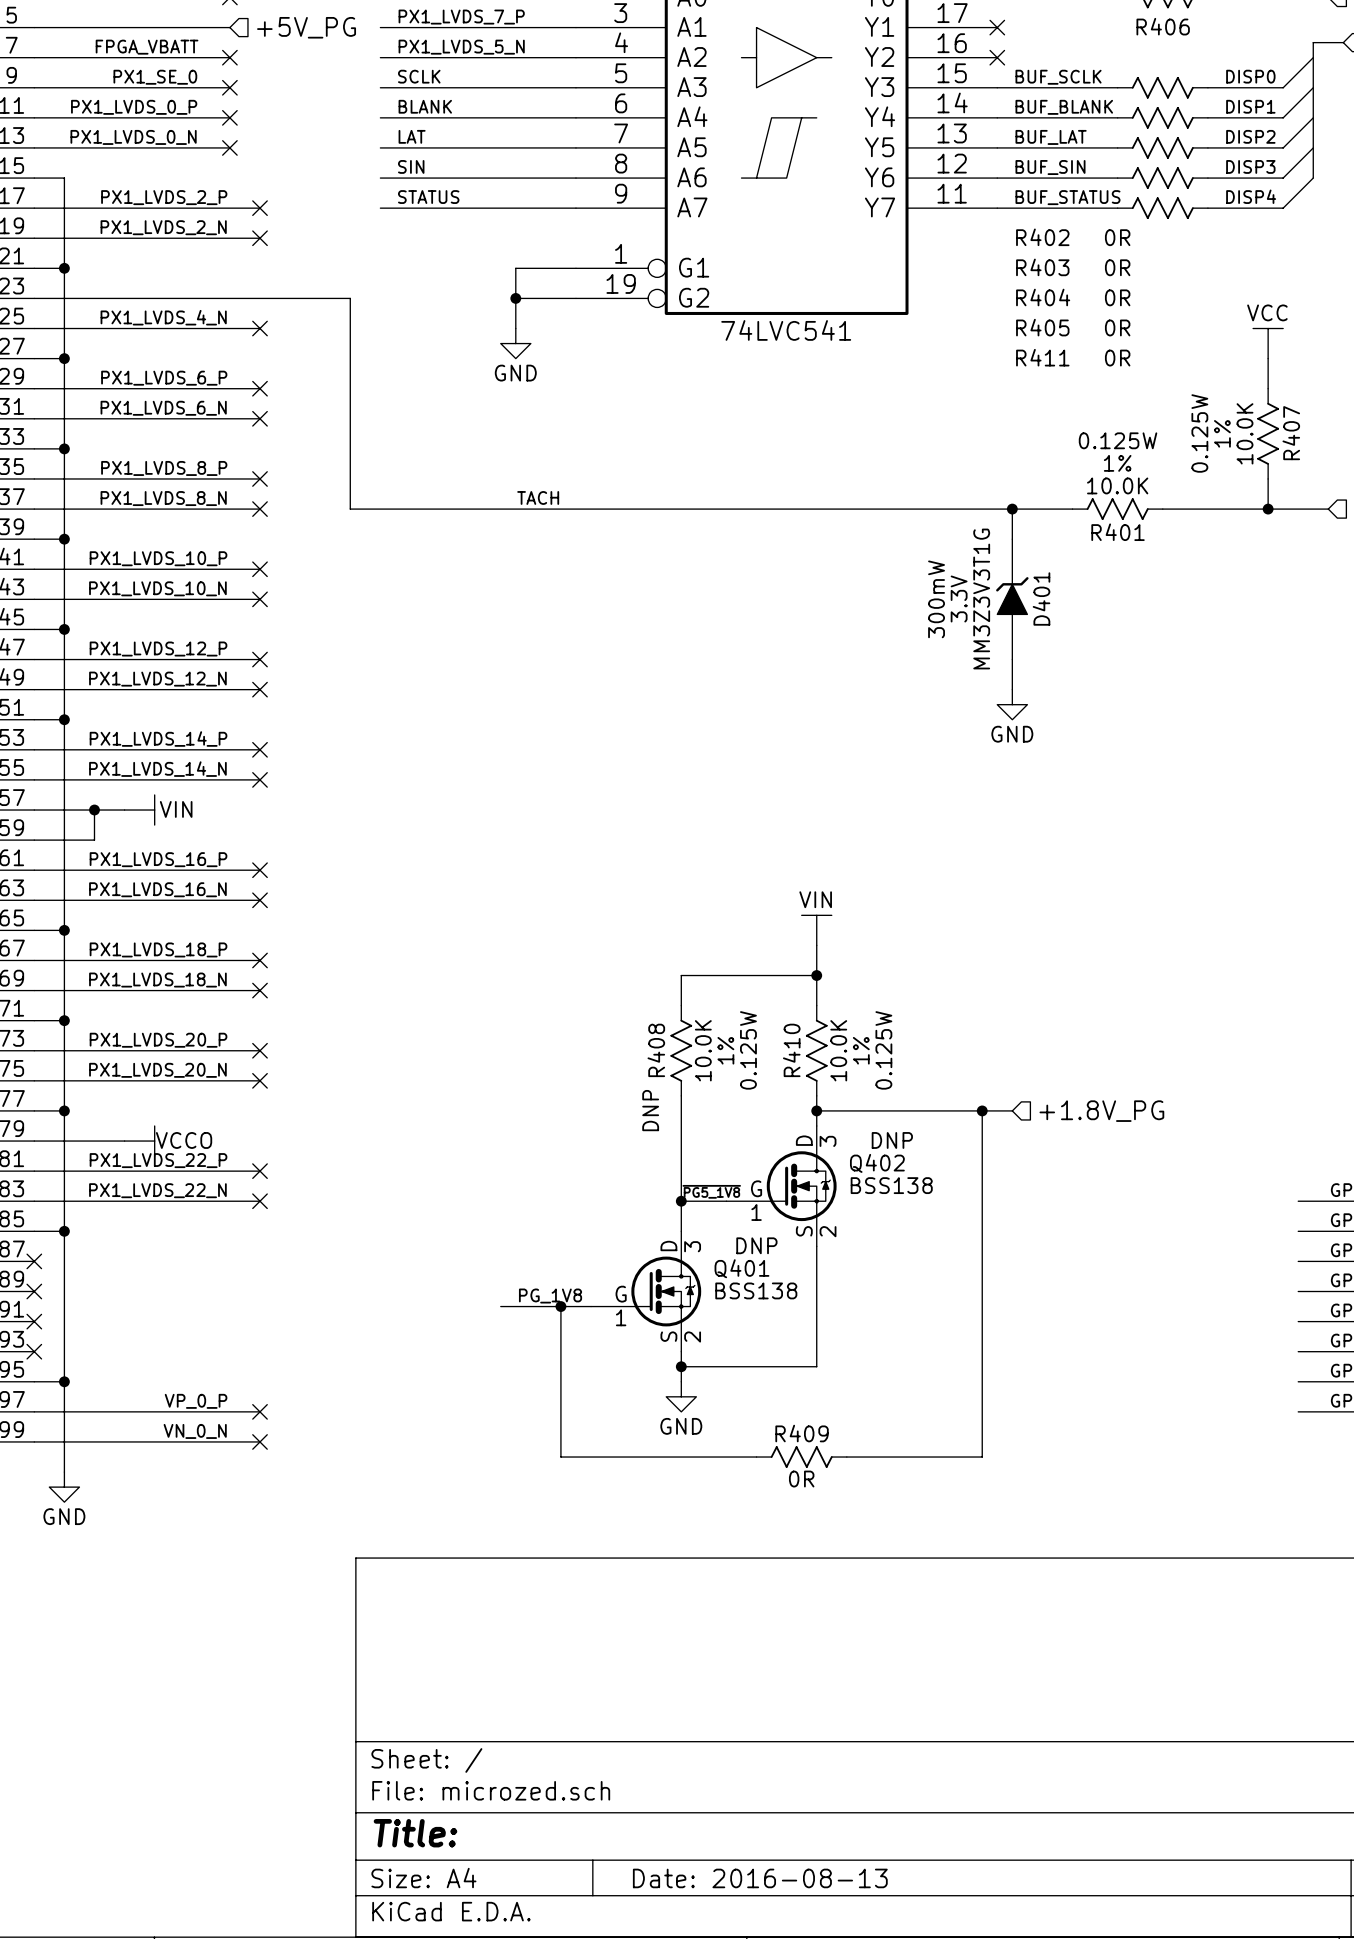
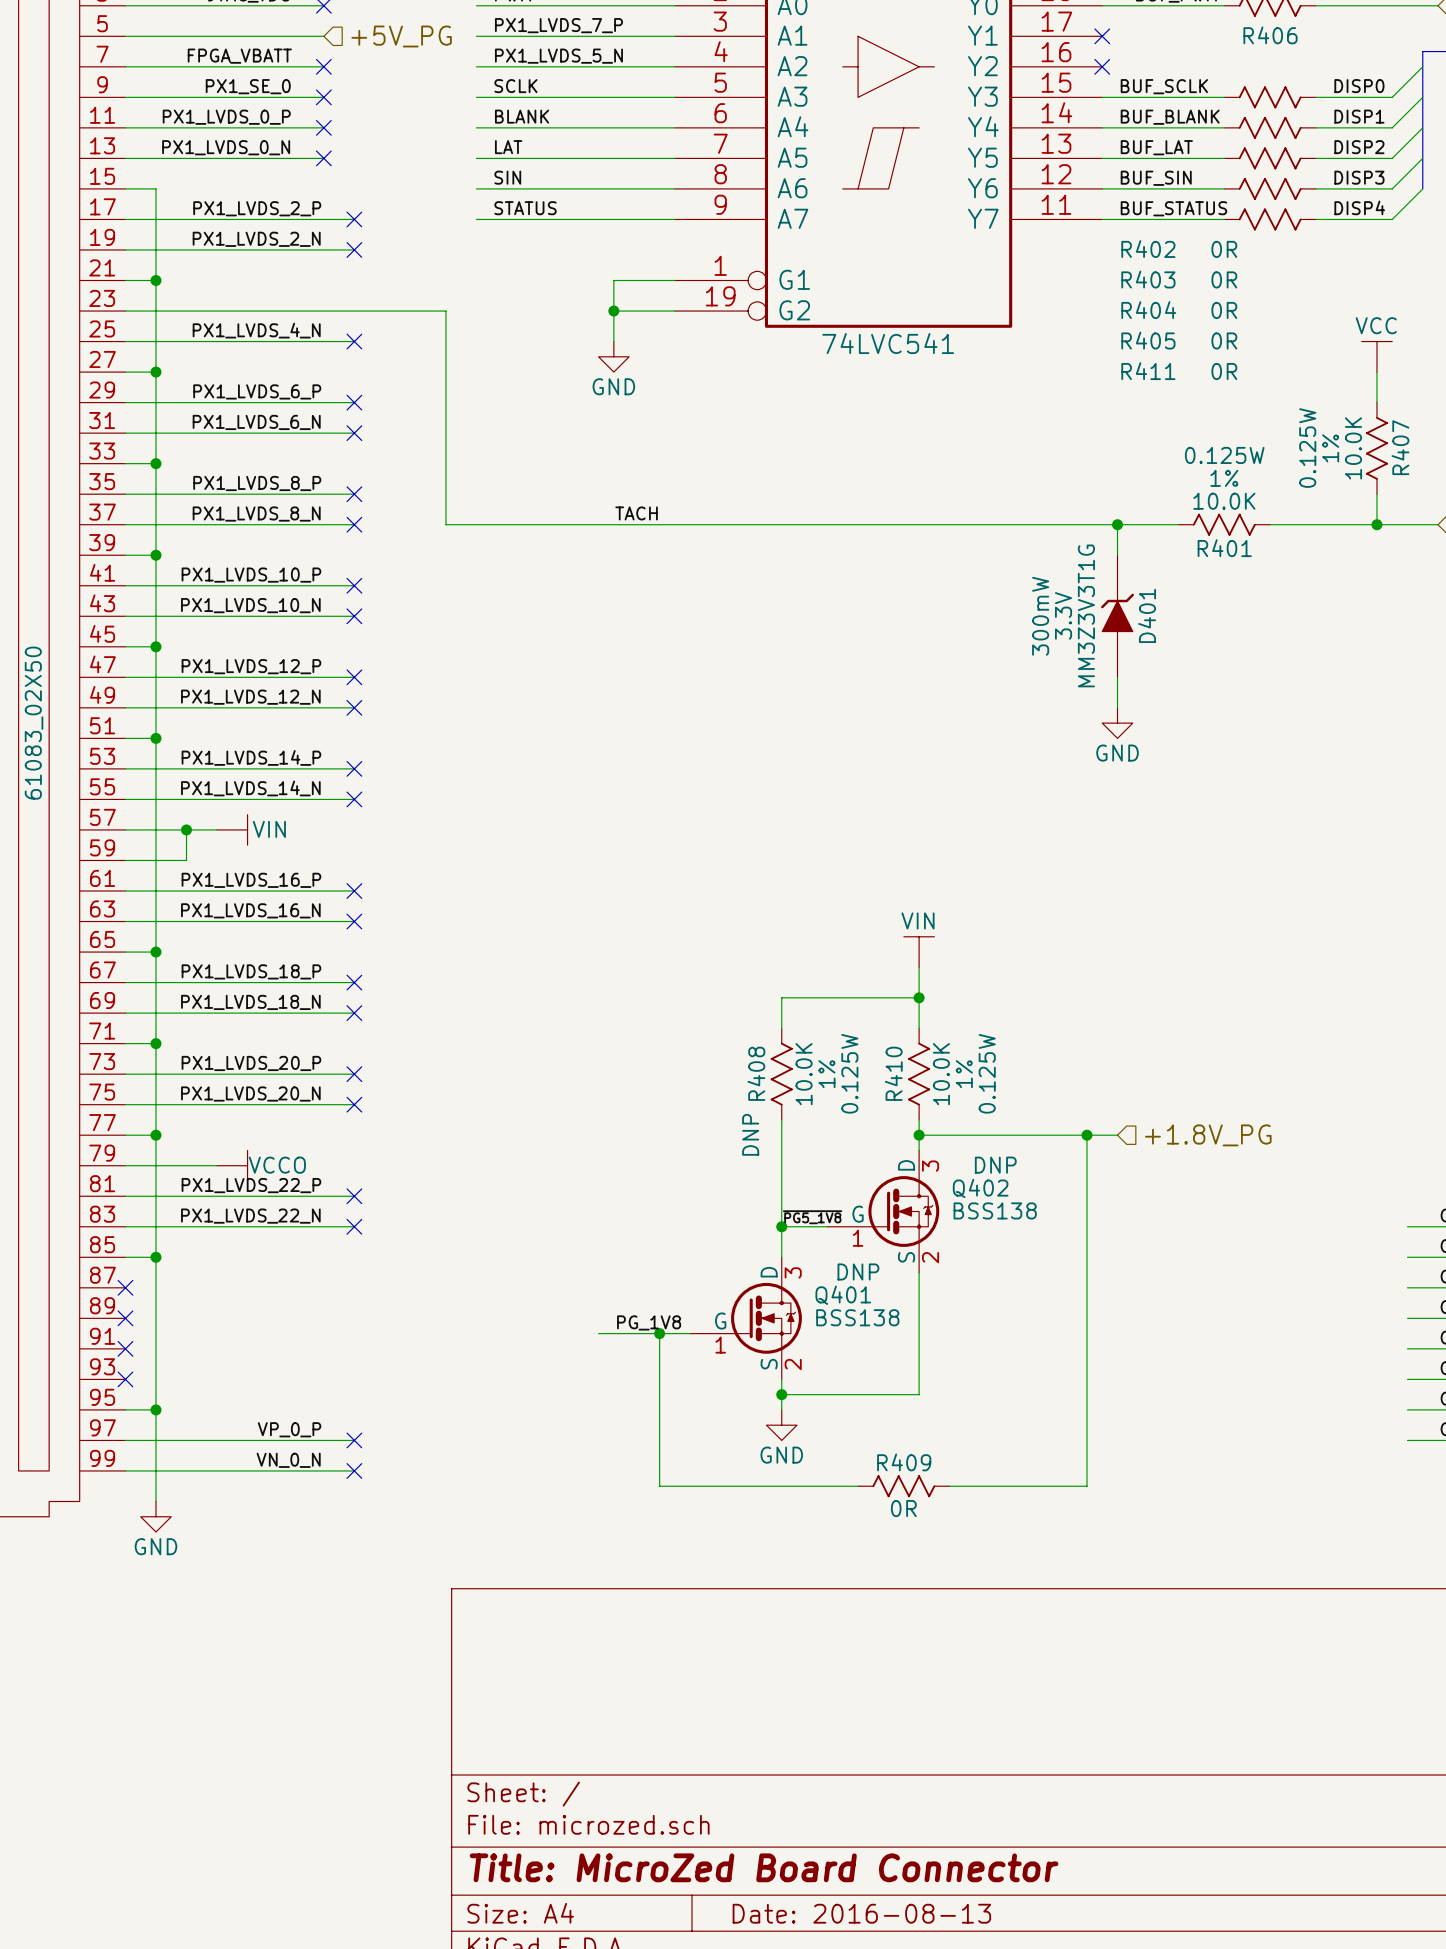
title block: Title: (415, 1833) -> Title: MicroZed Board Connector (764, 1867)

